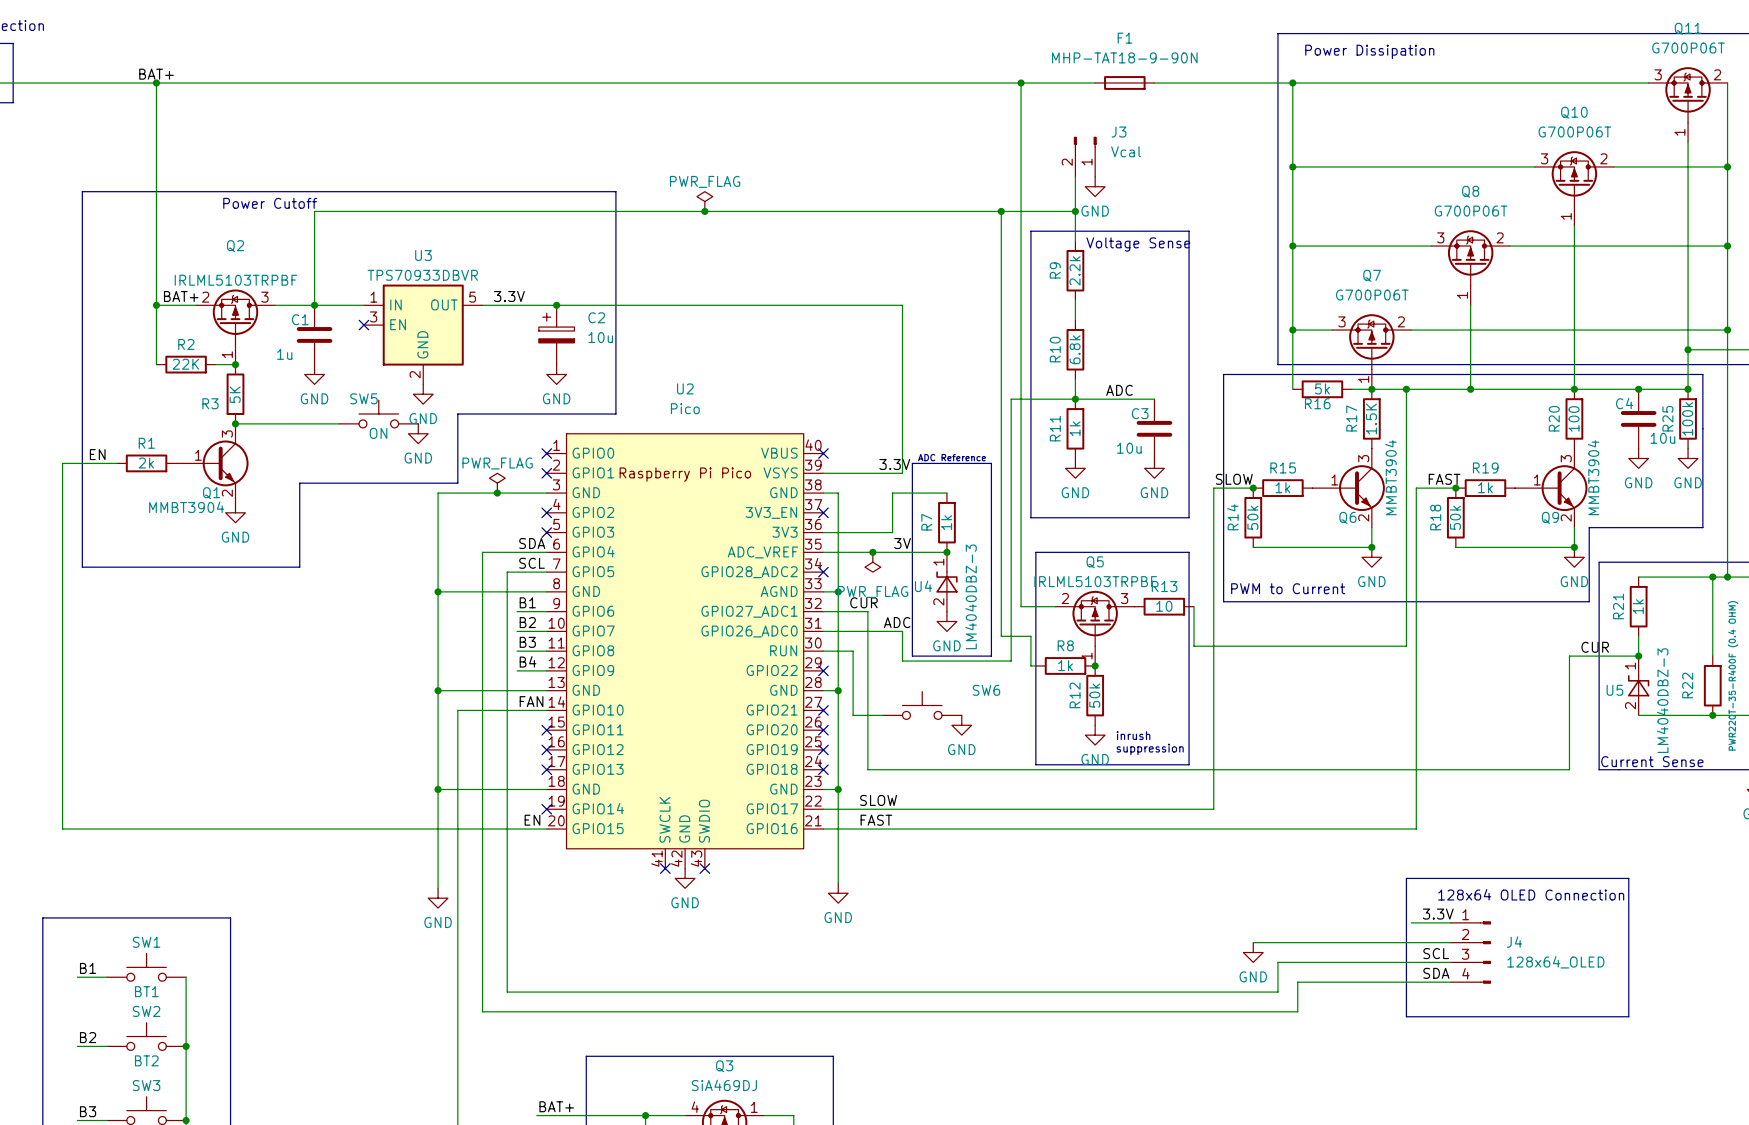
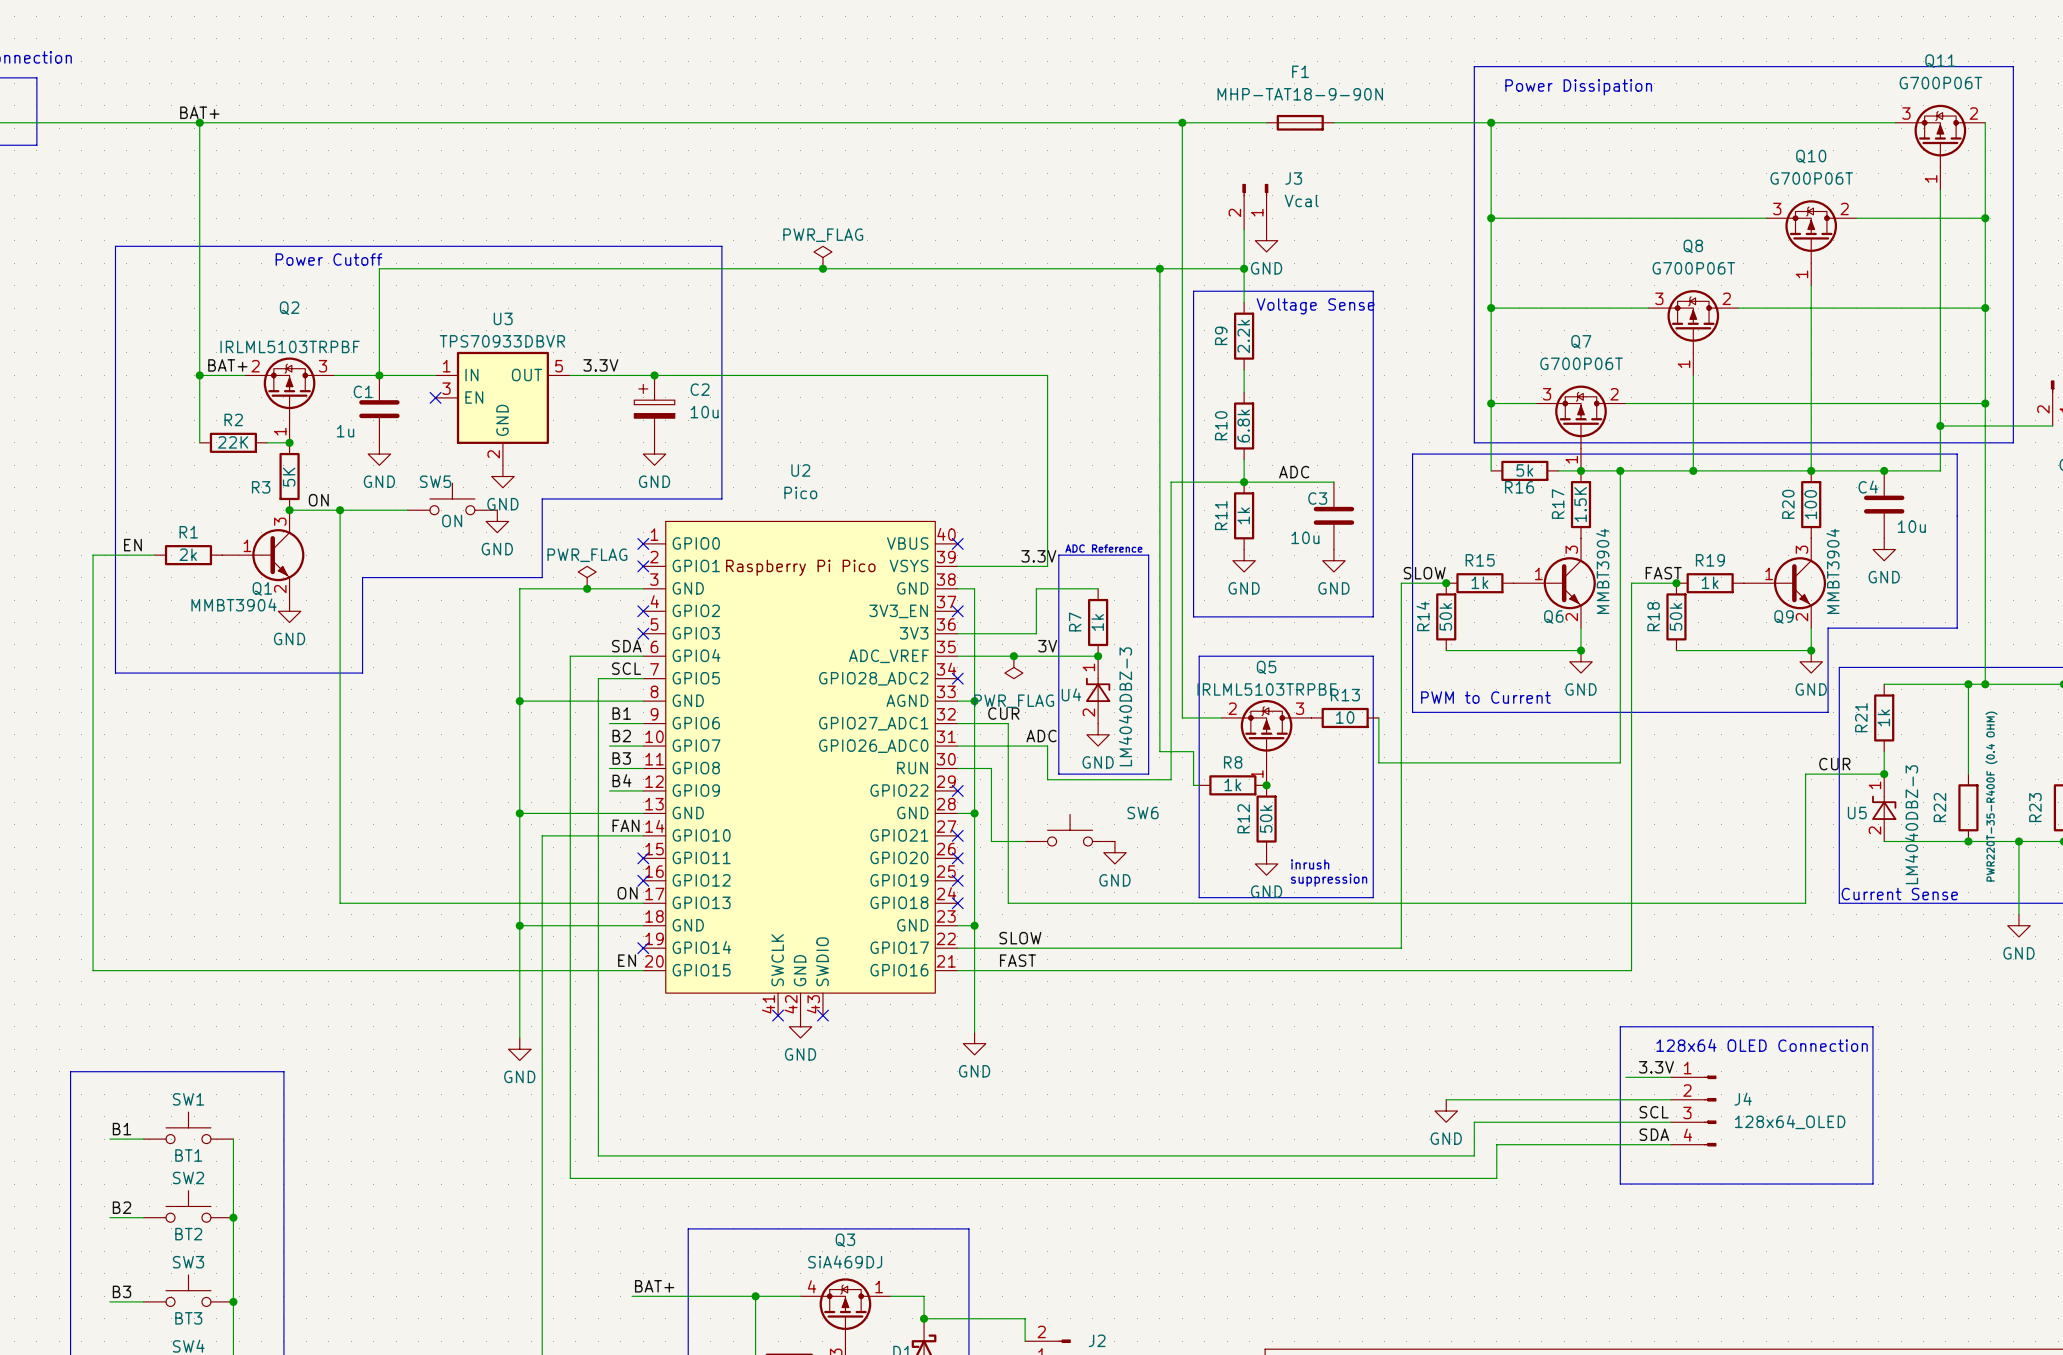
junction: (1688, 389) -> none
label: none -> ON (318, 500)
R25: 100k (1688, 418) -> none
wire: none -> (340, 510) (340, 903) (643, 903)
junction: none -> (340, 510)
power symbol: GND (1688, 458) -> none
label: none -> ON (627, 893)
no-connect mark: (546, 769) -> none

